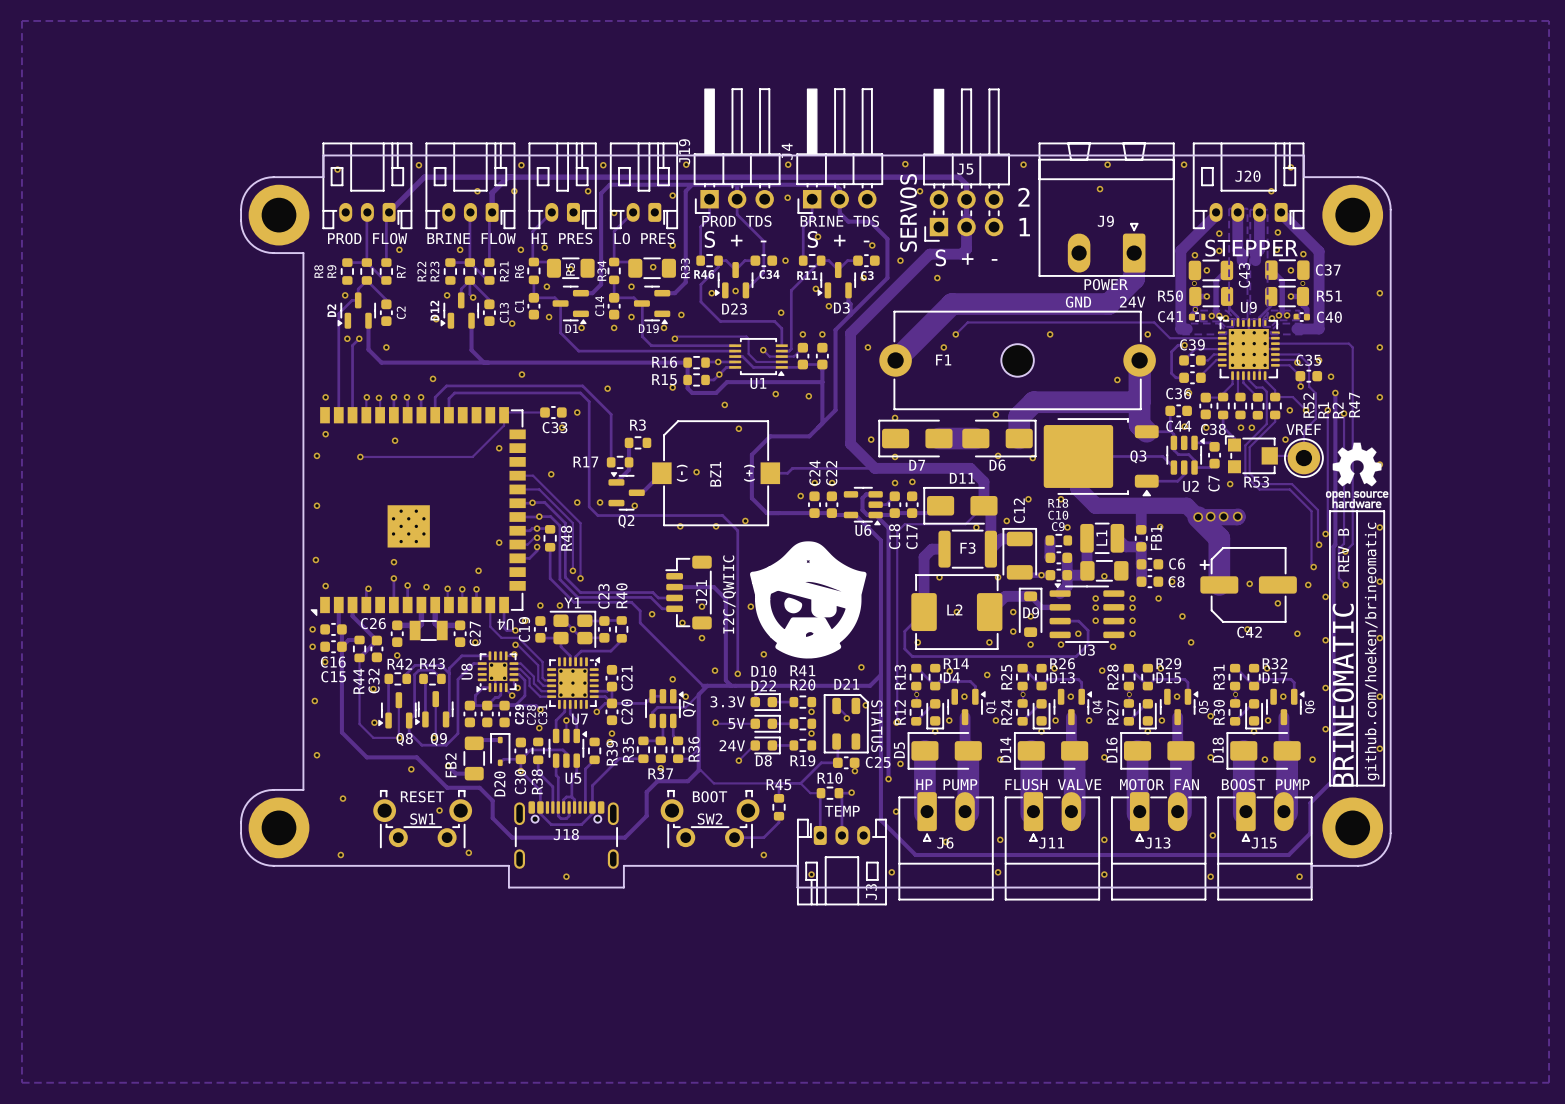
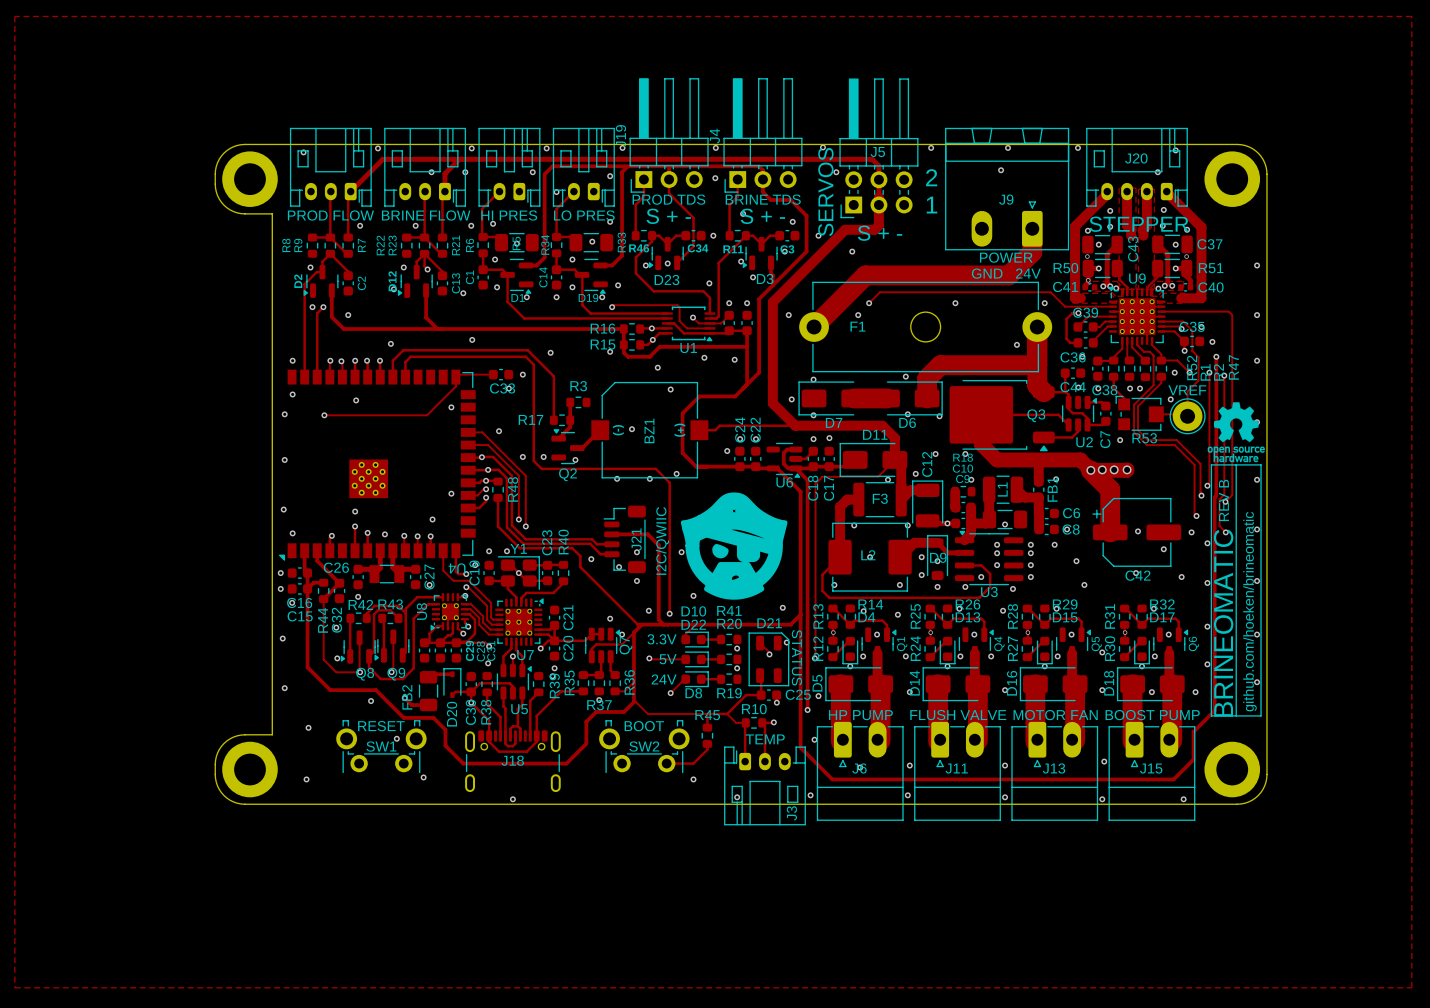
board edge: (1390, 209) (1388, 197) (1383, 189) (1370, 179) (1358, 177) (1303, 177) (1303, 155) (323, 155) (323, 177) (265, 178) (250, 186) (242, 201) (242, 228) (247, 240) (253, 246) (269, 252) (303, 253) -> (1266, 189) (1266, 170) (1262, 159) (1252, 148) (1237, 144) (245, 144) (230, 148) (221, 156) (216, 166) (215, 188) (219, 199) (226, 207) (237, 212) (272, 213) (272, 228)
part position: (279, 215) -> (249, 179)
part position: (1352, 215) -> (1232, 179)
board edge: (303, 789) (265, 791) (257, 794) (247, 802) (241, 818) (241, 837) (245, 849) (253, 859) (261, 863) (273, 865) (508, 865) (508, 887) (623, 887) (623, 865) (797, 865) (797, 887) (1311, 887) (1311, 865) (1358, 865) (1370, 863) (1383, 853) (1389, 841) (1390, 833) -> (272, 719) (272, 734) (237, 735) (226, 740) (219, 749) (215, 760) (216, 782) (221, 792) (230, 800) (245, 804) (1237, 804) (1252, 800) (1262, 789) (1266, 778) (1266, 759)
part position: (279, 827) -> (249, 769)
part position: (1352, 827) -> (1232, 769)

